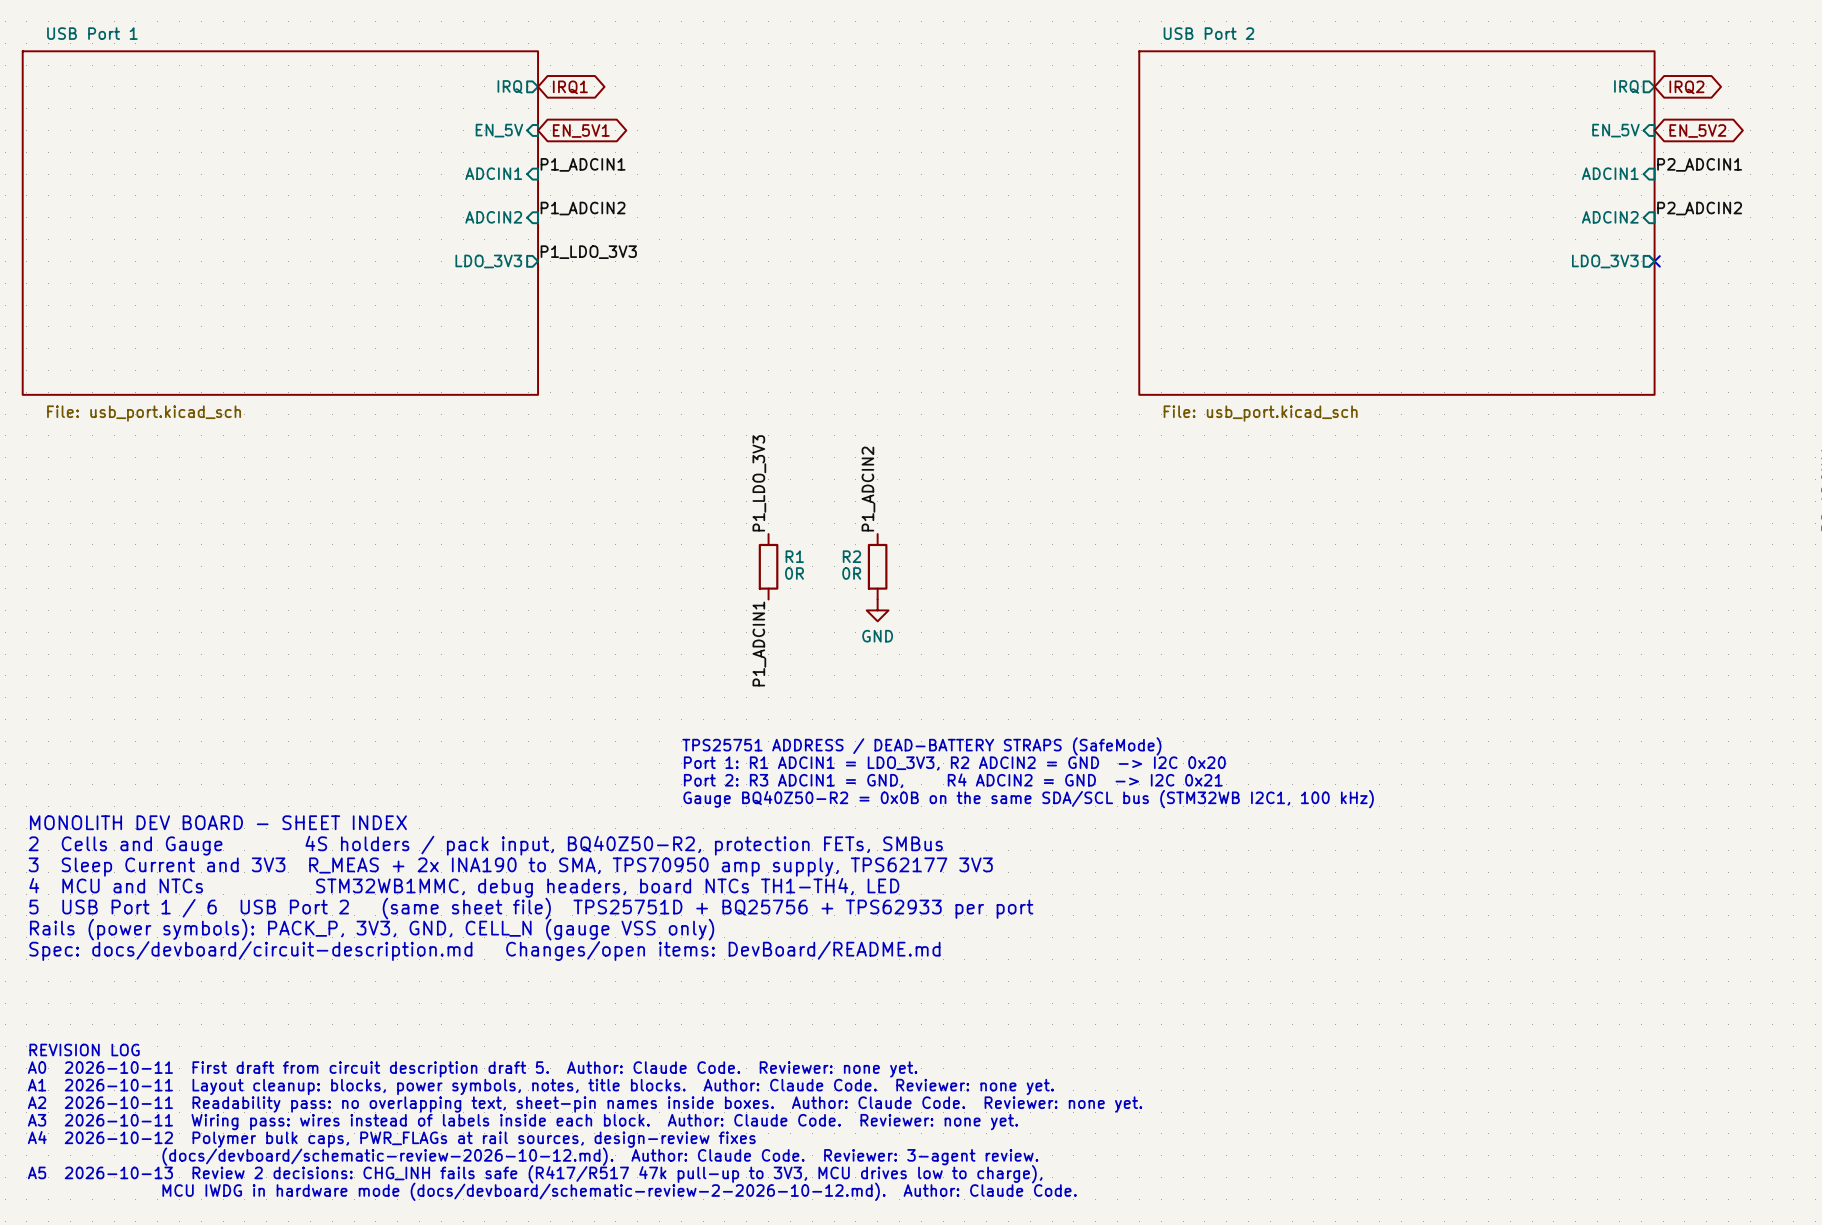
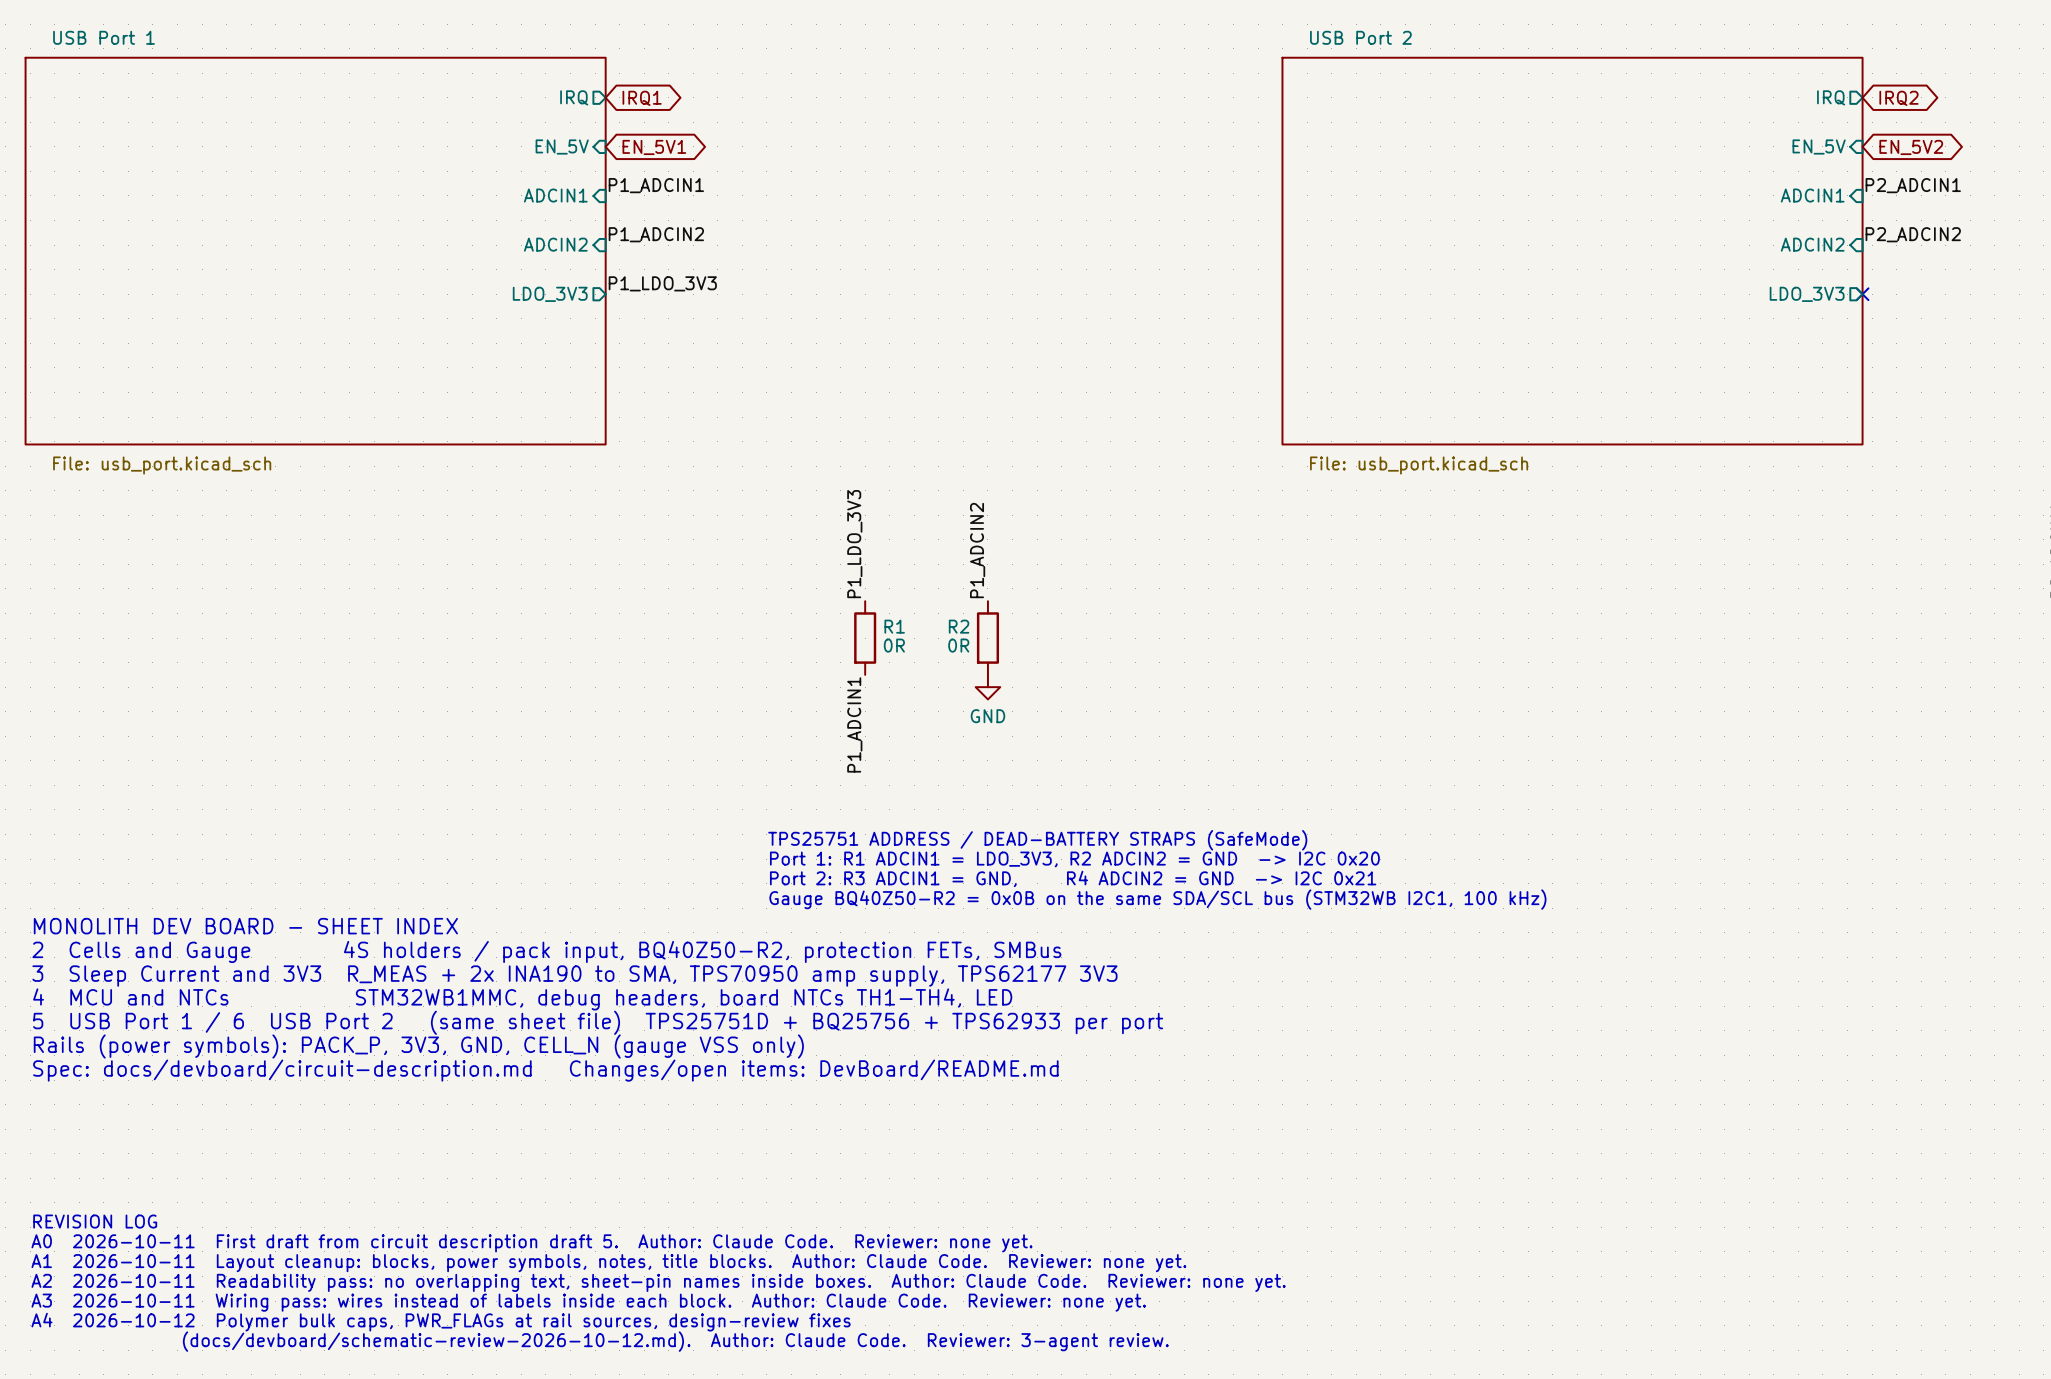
text: REVISION LOG (84, 1050) -> none
text: A0 2026-10-11 First draft from circuit description draft 5. Author: Claude Code. Reviewer: none yet. (472, 1069) -> none
text: A1 2026-10-11 Layout cleanup: blocks, power symbols, notes, title blocks. Author: Claude Code. Reviewer: none yet. (540, 1086) -> REVISION LOG (95, 1221)
text: A2 2026-10-11 Readability pass: no overlapping text, sheet-pin names inside boxes. Author: Claude Code. Reviewer: none yet. (585, 1104) -> A0 2026-10-11 First draft from circuit description draft 5. Author: Claude Code. Reviewer: none yet. (531, 1243)
text: A3 2026-10-11 Wiring pass: wires instead of labels inside each block. Author: Claude Code. Reviewer: none yet. (522, 1122) -> A1 2026-10-11 Layout cleanup: blocks, power symbols, notes, title blocks. Author: Claude Code. Reviewer: none yet. (608, 1263)
text: A4 2026-10-12 Polymer bulk caps, PWR_FLAGs at rail sources, design-review fixes (391, 1139) -> A2 2026-10-11 Readability pass: no overlapping text, sheet-pin names inside boxes. Author: Claude Code. Reviewer: none yet. (658, 1282)
text: (docs/devboard/schematic-review-2026-10-12.md). Author: Claude Code. Reviewer: 3-agent review. (600, 1156) -> A3 2026-10-11 Wiring pass: wires instead of labels inside each block. Author: Claude Code. Reviewer: none yet. (588, 1302)
text: A5 2026-10-13 Review 2 decisions: CHG_INH fails safe (R417/R517 47k pull-up to 3V3, MCU drives low to charge), (535, 1174) -> A4 2026-10-12 Polymer bulk caps, PWR_FLAGs at rail sources, design-review fixes (441, 1322)
text: MCU IWDG in hardware mode (docs/devboard/schematic-review-2-2026-10-12.md). Author: Claude Code. (619, 1191) -> (docs/devboard/schematic-review-2026-10-12.md). Author: Claude Code. Reviewer: 3-agent review. (675, 1341)

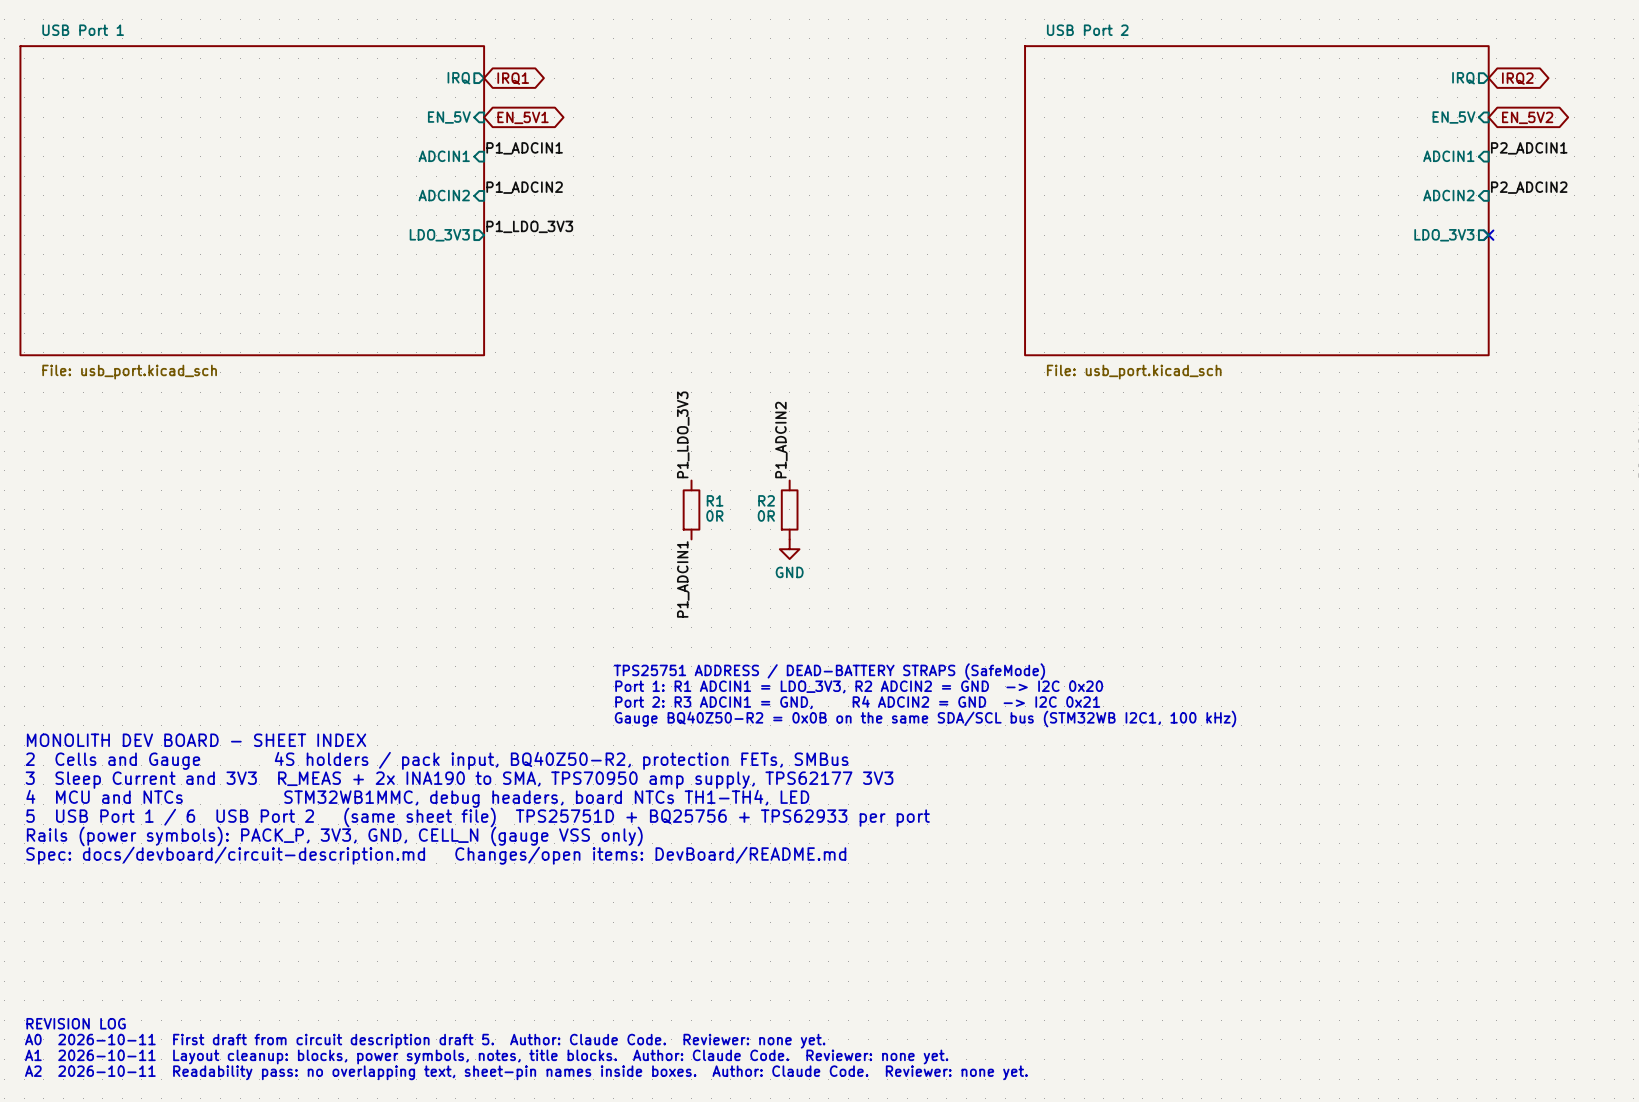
text: REVISION LOG (95, 1221) -> none
text: A0 2026-10-11 First draft from circuit description draft 5. Author: Claude Code. Reviewer: none yet. (531, 1243) -> none
text: A1 2026-10-11 Layout cleanup: blocks, power symbols, notes, title blocks. Author: Claude Code. Reviewer: none yet. (608, 1263) -> none
text: A2 2026-10-11 Readability pass: no overlapping text, sheet-pin names inside boxes. Author: Claude Code. Reviewer: none yet. (658, 1282) -> REVISION LOG (76, 1023)
text: A3 2026-10-11 Wiring pass: wires instead of labels inside each block. Author: Claude Code. Reviewer: none yet. (588, 1302) -> A0 2026-10-11 First draft from circuit description draft 5. Author: Claude Code. Reviewer: none yet. (425, 1041)
text: A4 2026-10-12 Polymer bulk caps, PWR_FLAGs at rail sources, design-review fixes (441, 1322) -> A1 2026-10-11 Layout cleanup: blocks, power symbols, notes, title blocks. Author: Claude Code. Reviewer: none yet. (486, 1056)
text: (docs/devboard/schematic-review-2026-10-12.md). Author: Claude Code. Reviewer: 3-agent review. (675, 1341) -> A2 2026-10-11 Readability pass: no overlapping text, sheet-pin names inside boxes. Author: Claude Code. Reviewer: none yet. (526, 1072)

